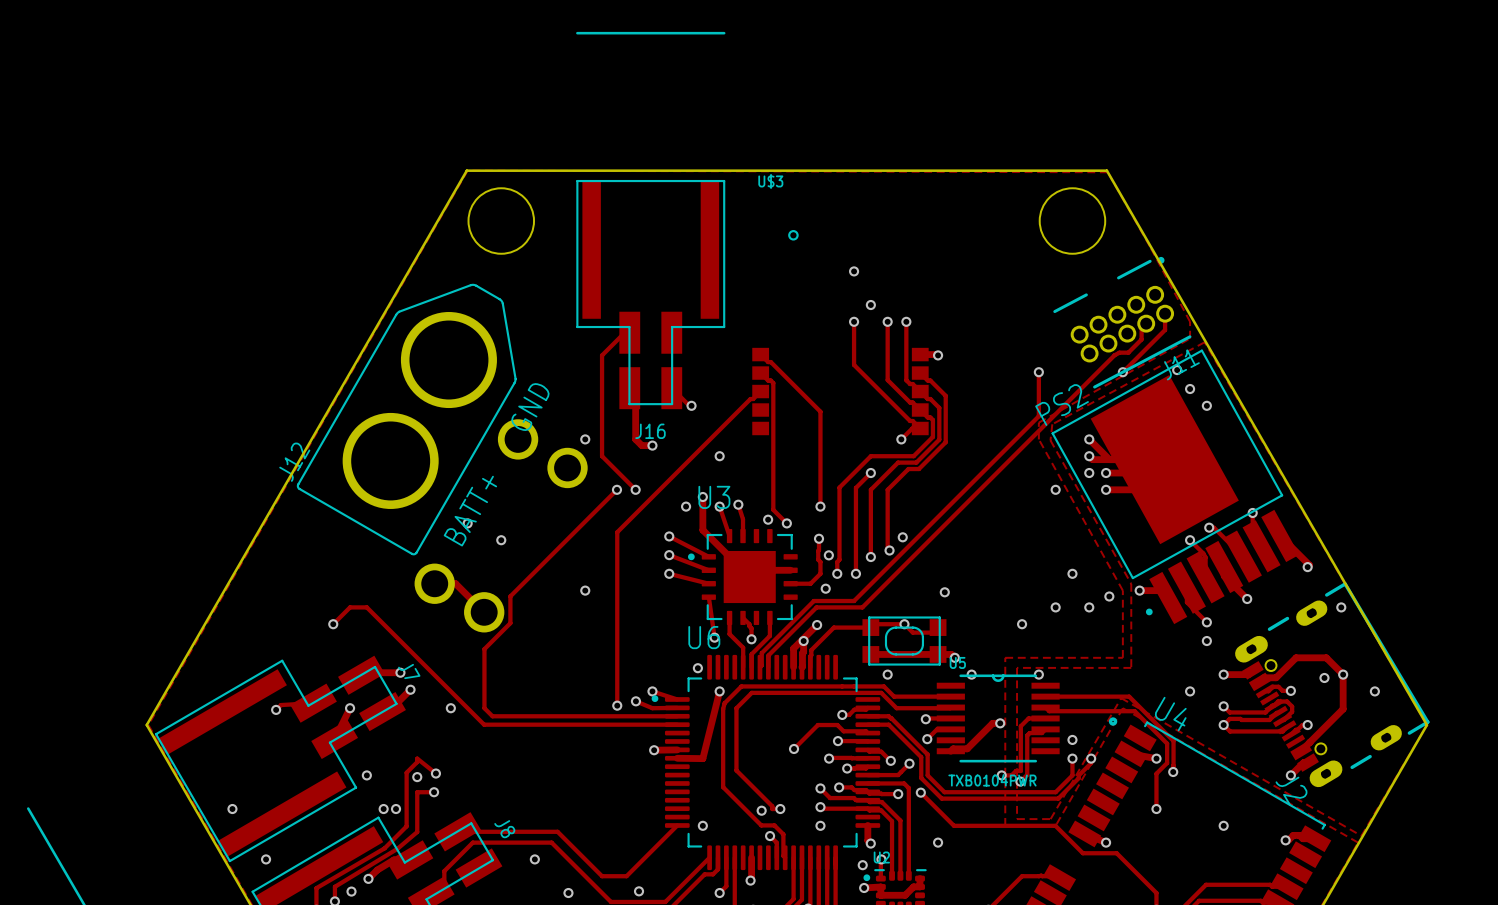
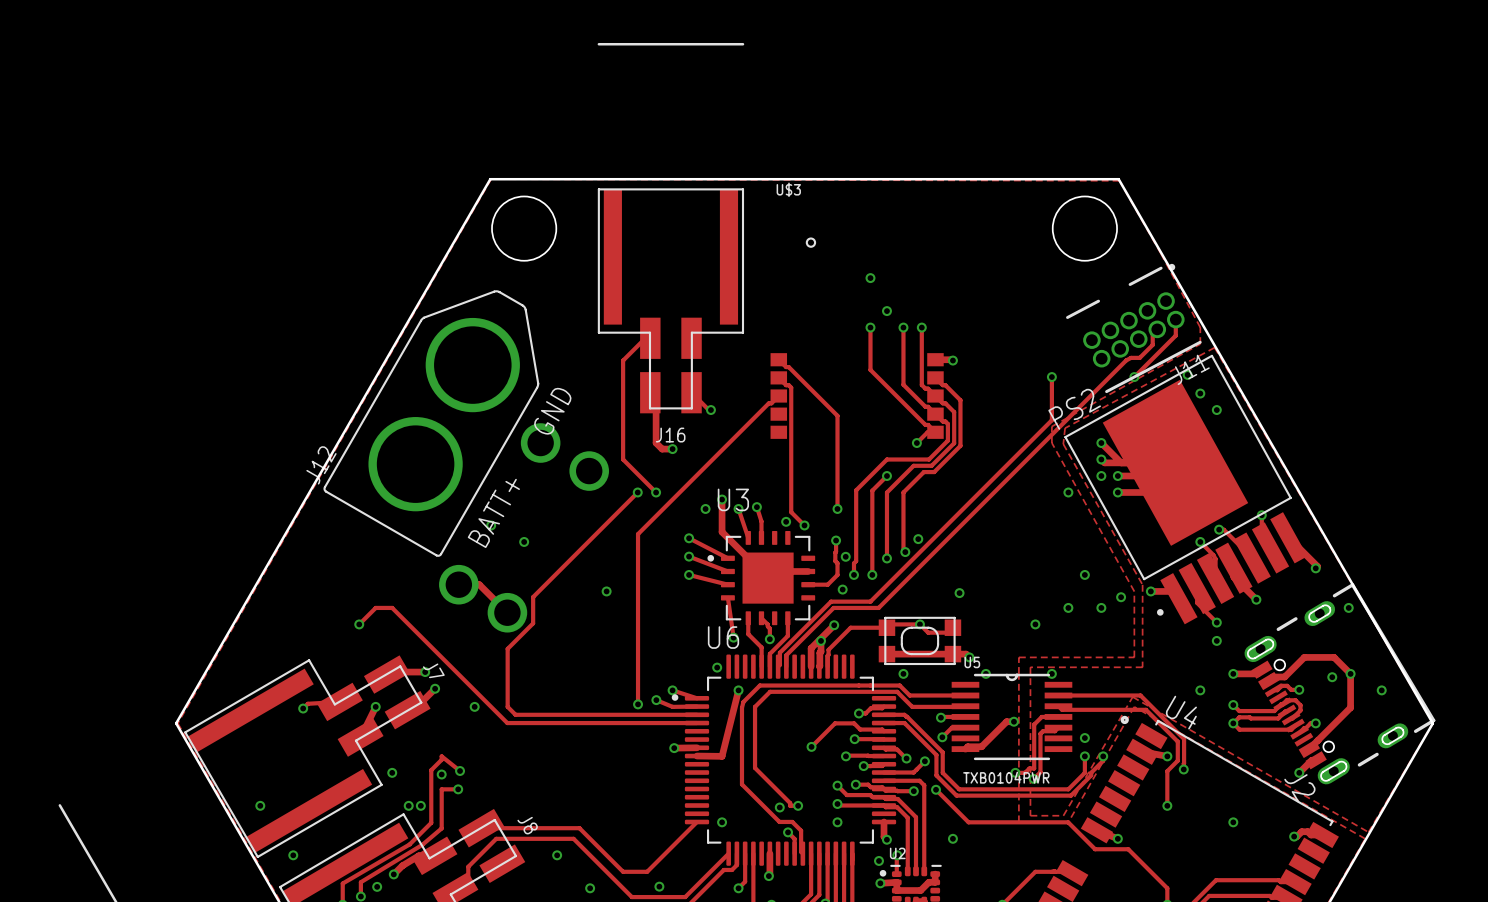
via: (585, 439) -> none
via: (719, 456) -> none

